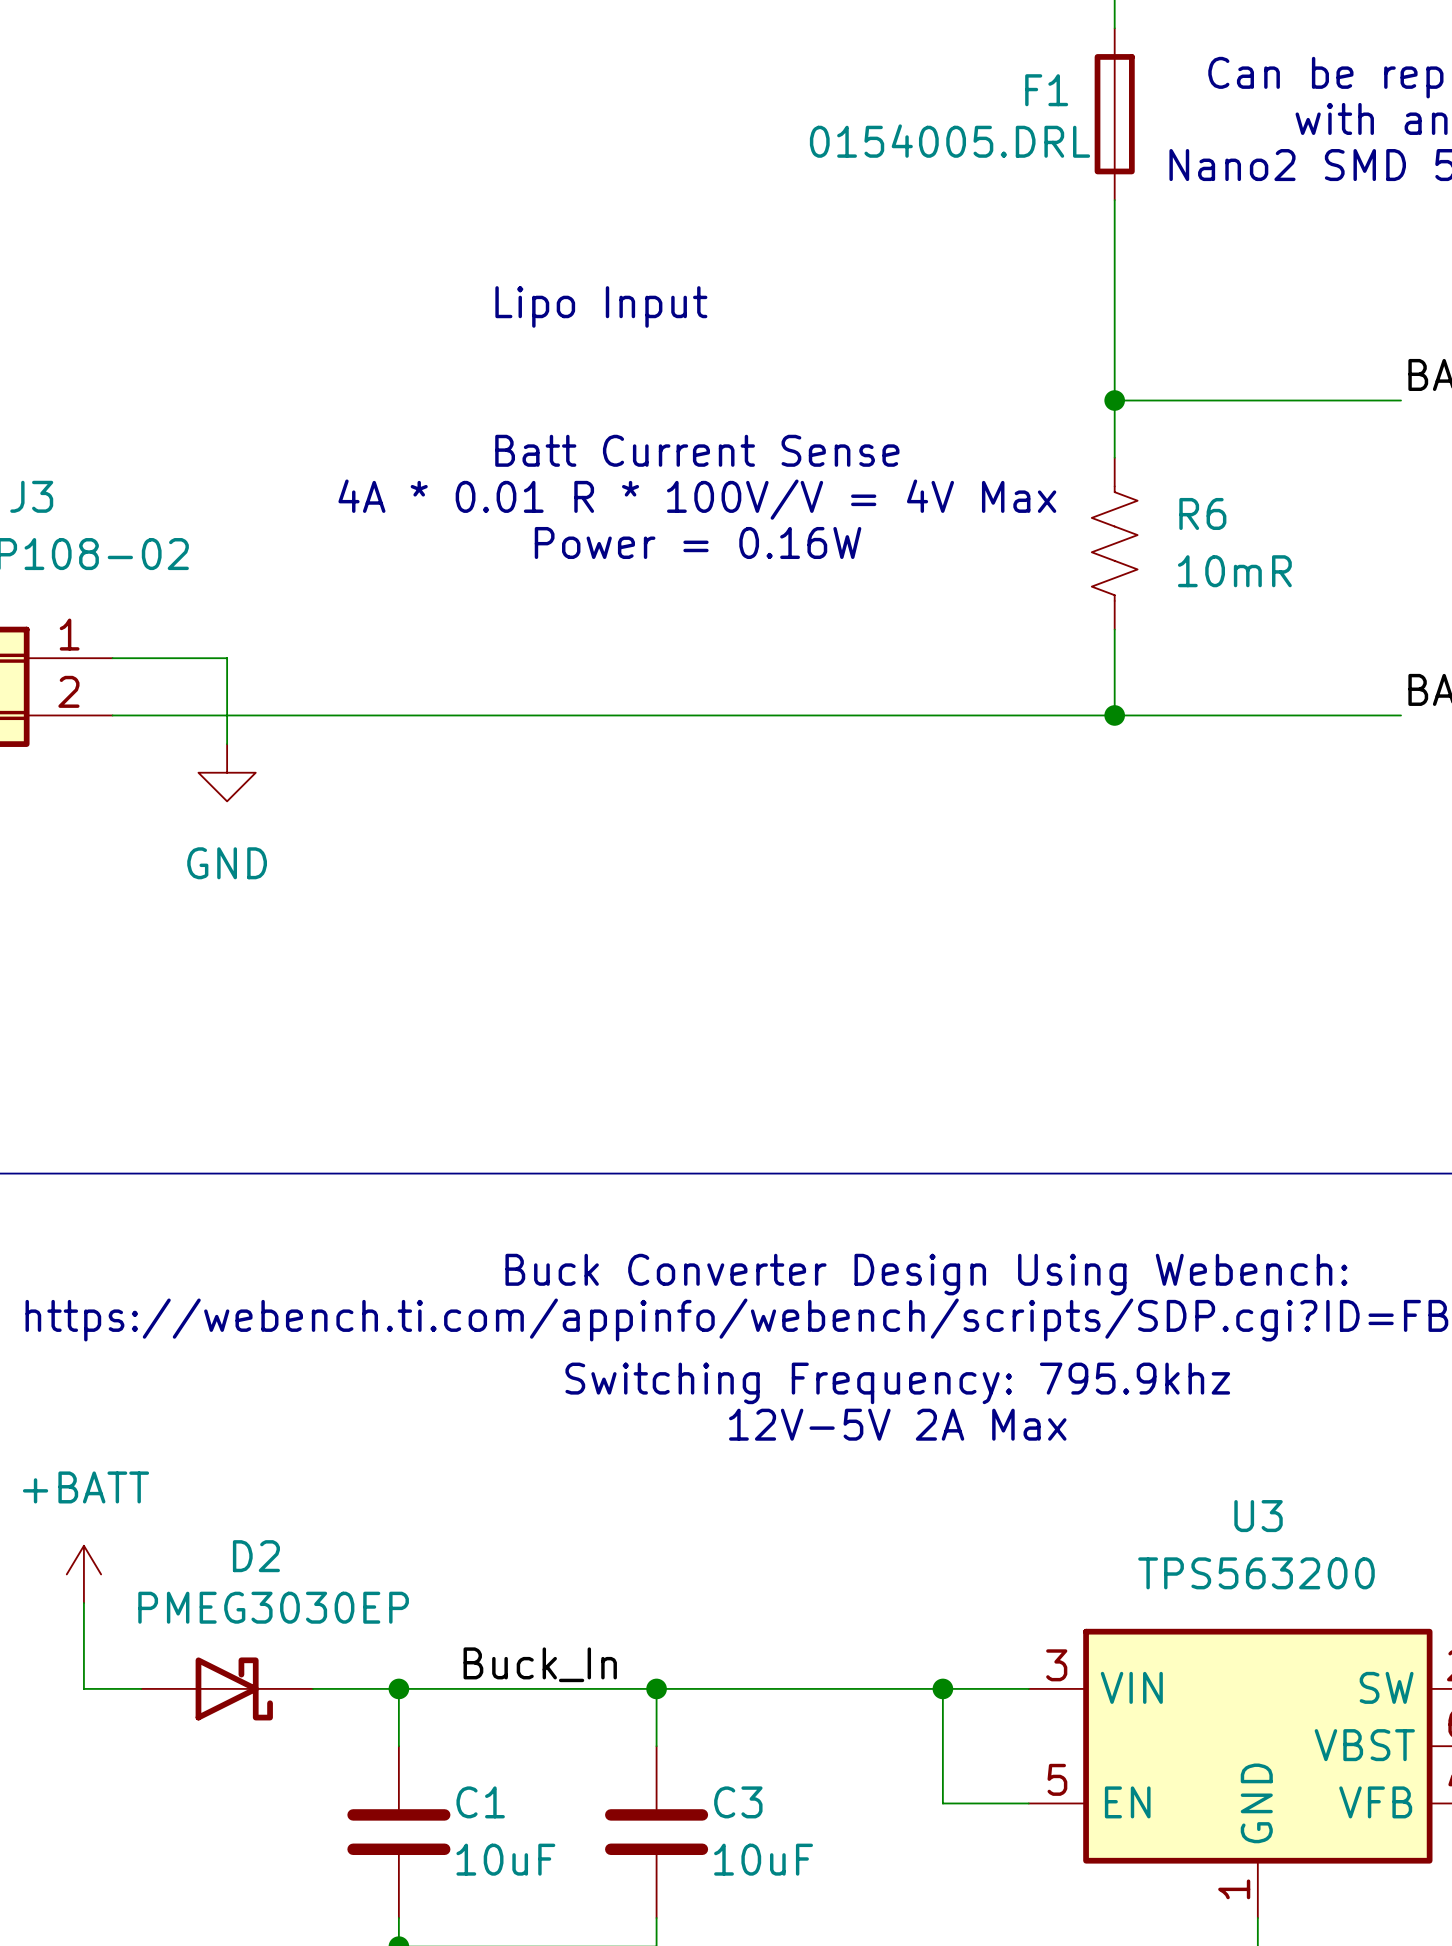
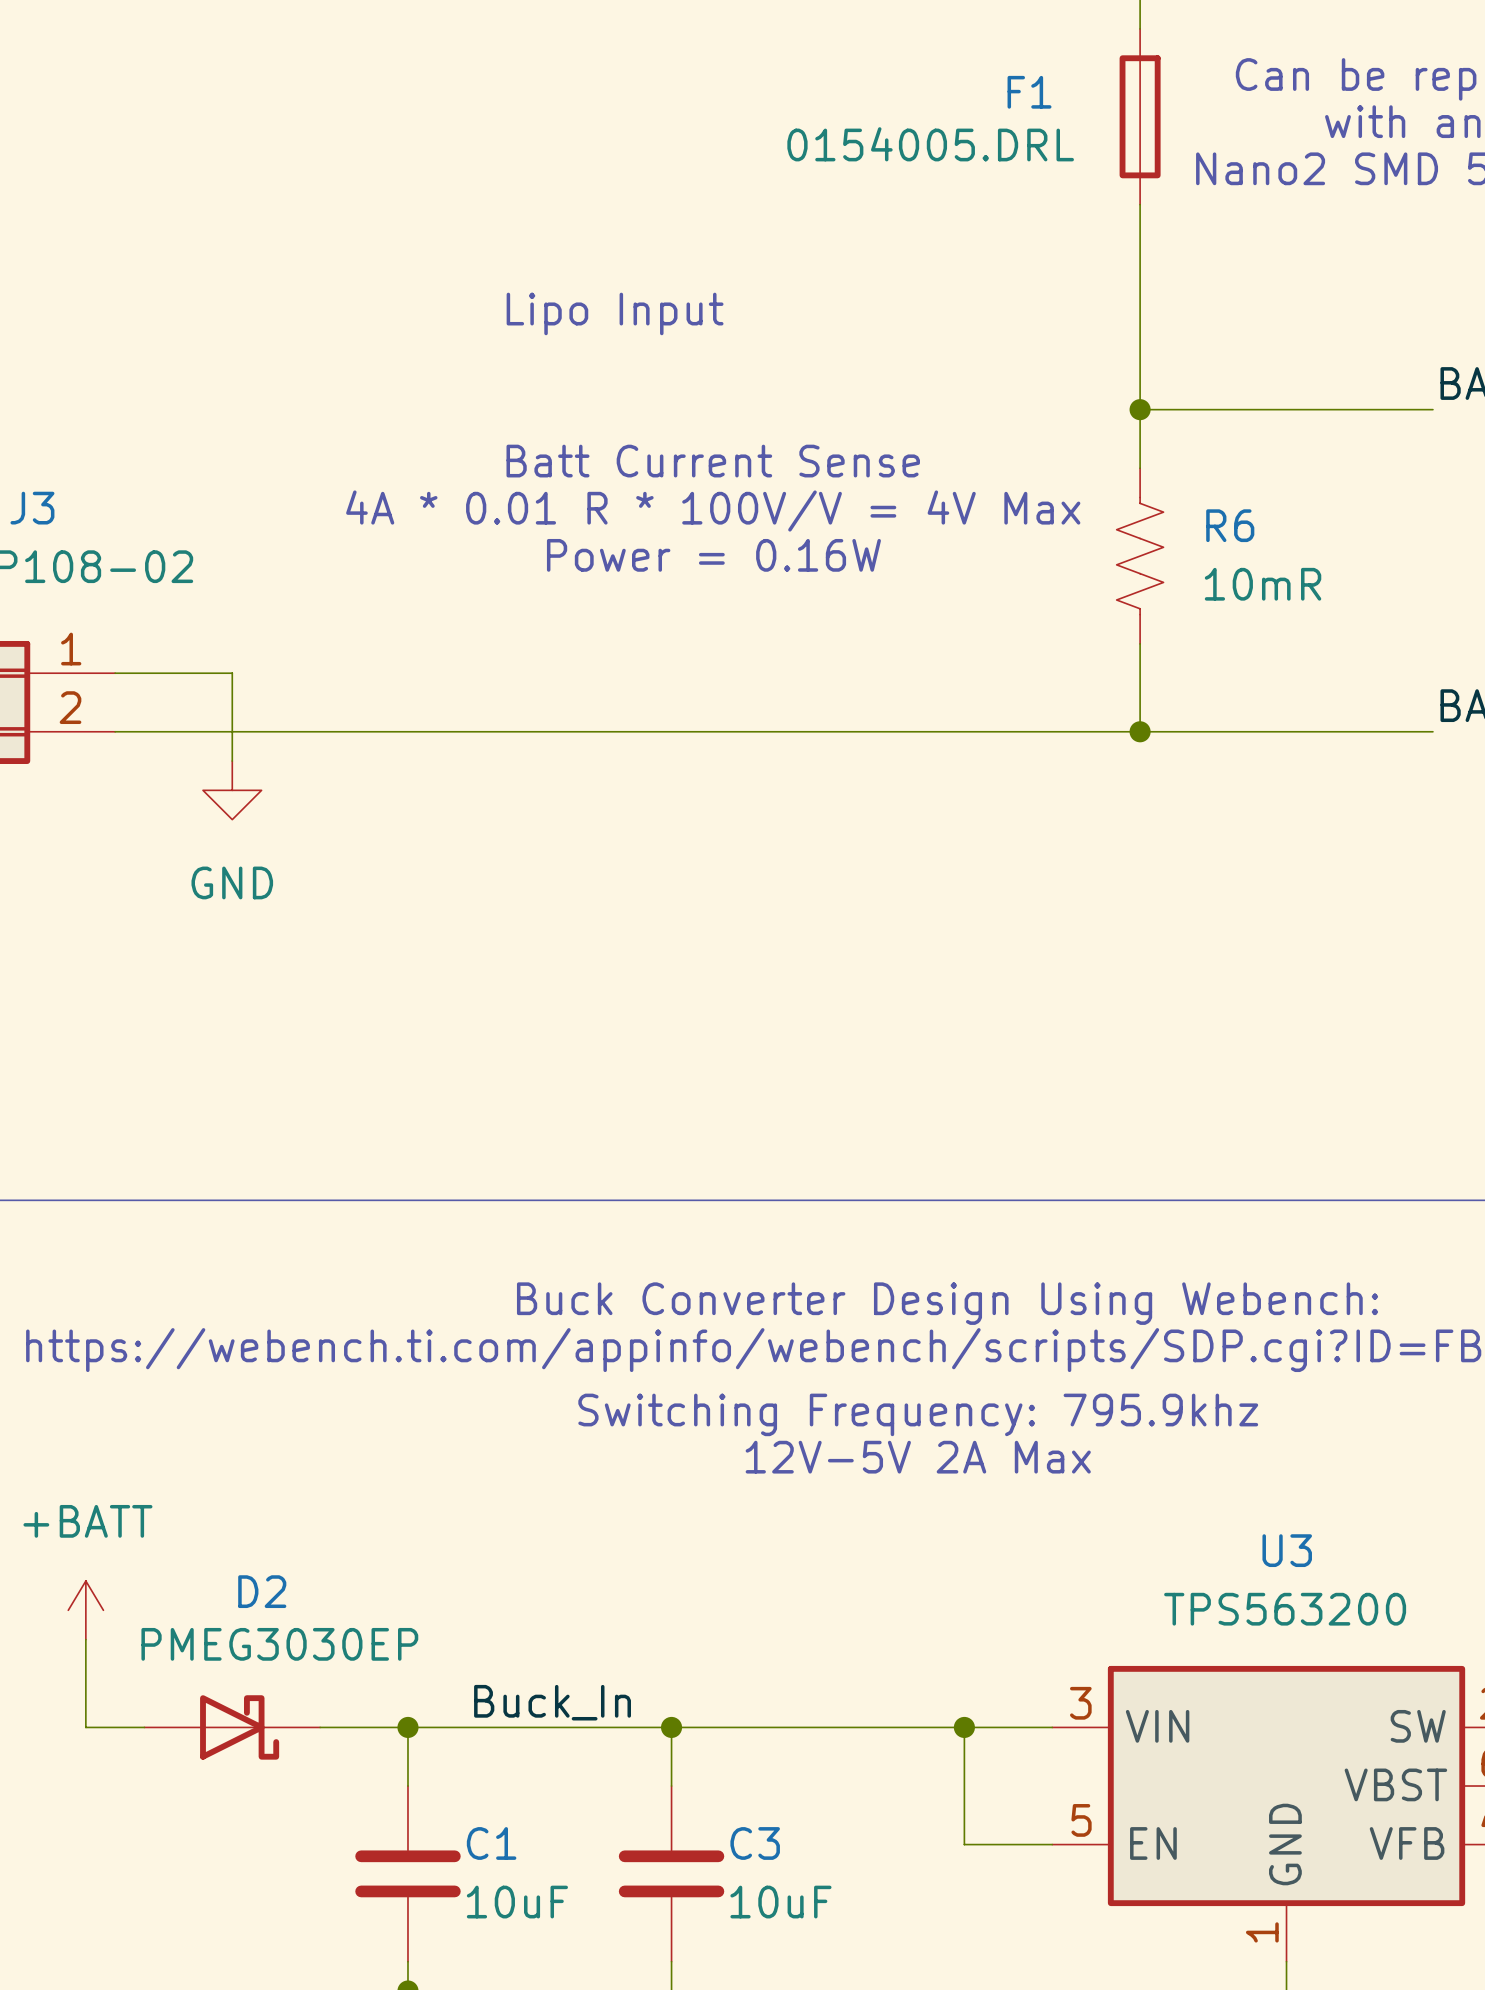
F1 name position: F1 (1046, 90) -> F1 (1029, 92)
F1 value position: 0154005.DRL (949, 141) -> 0154005.DRL (930, 144)

